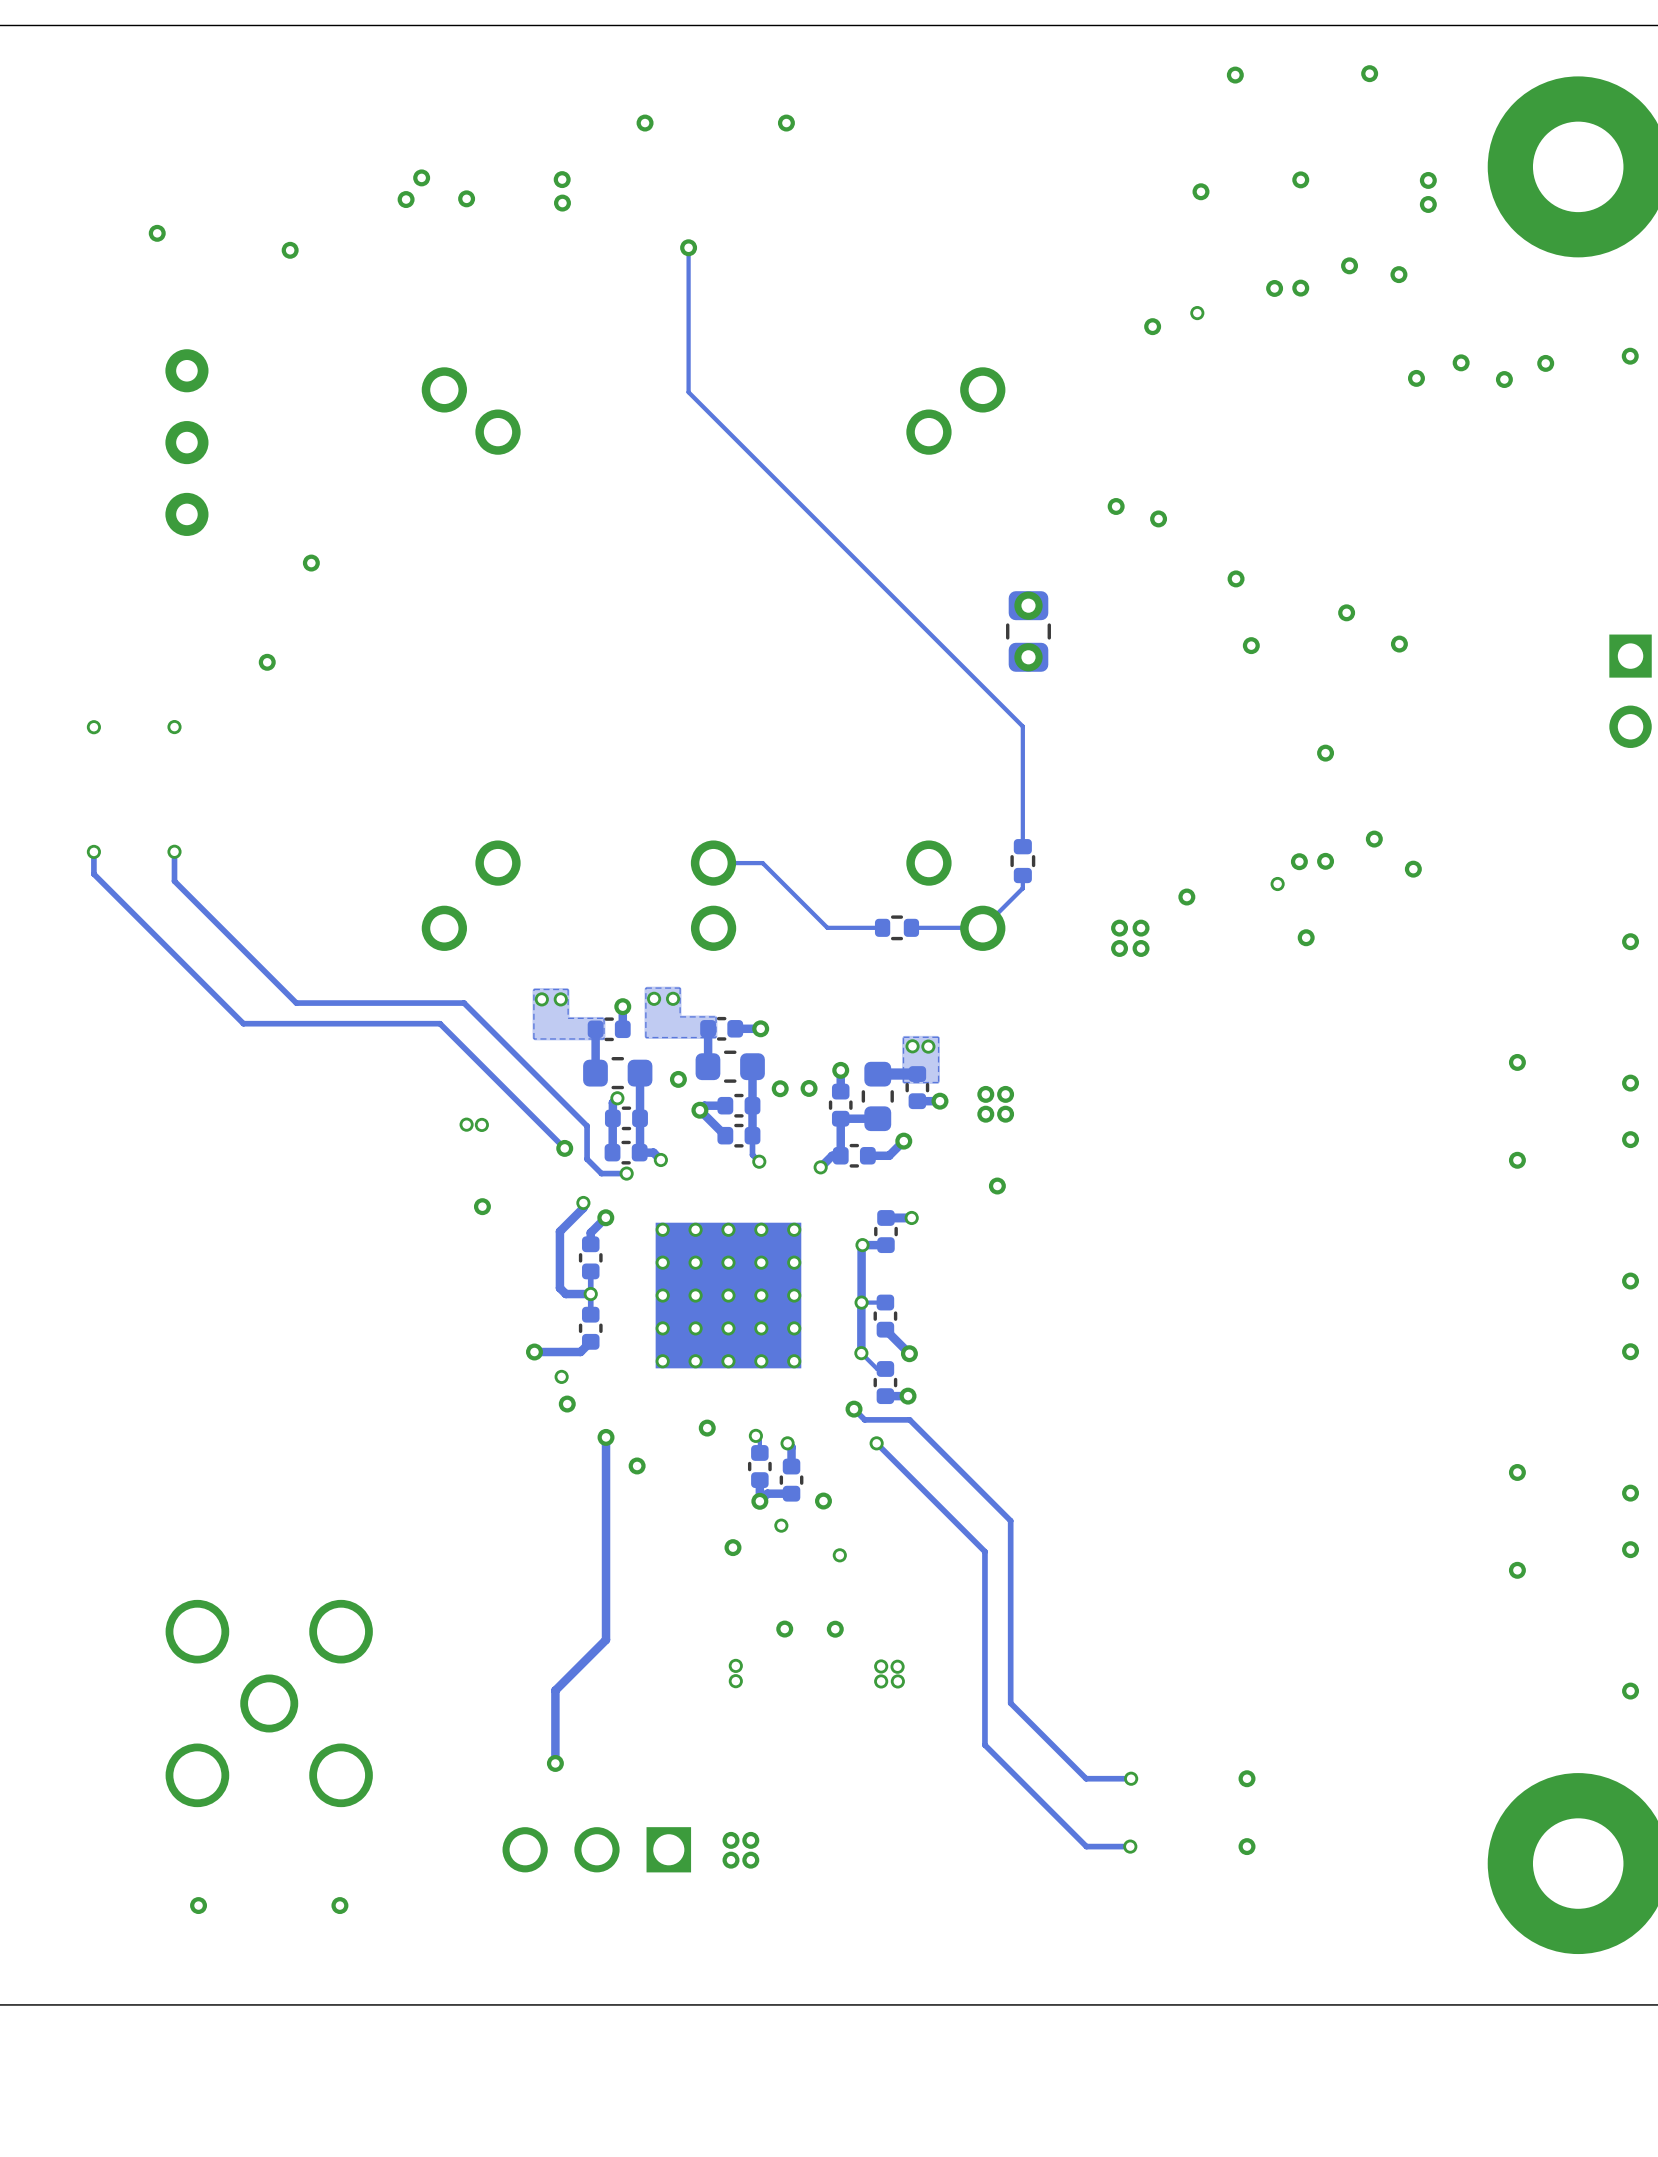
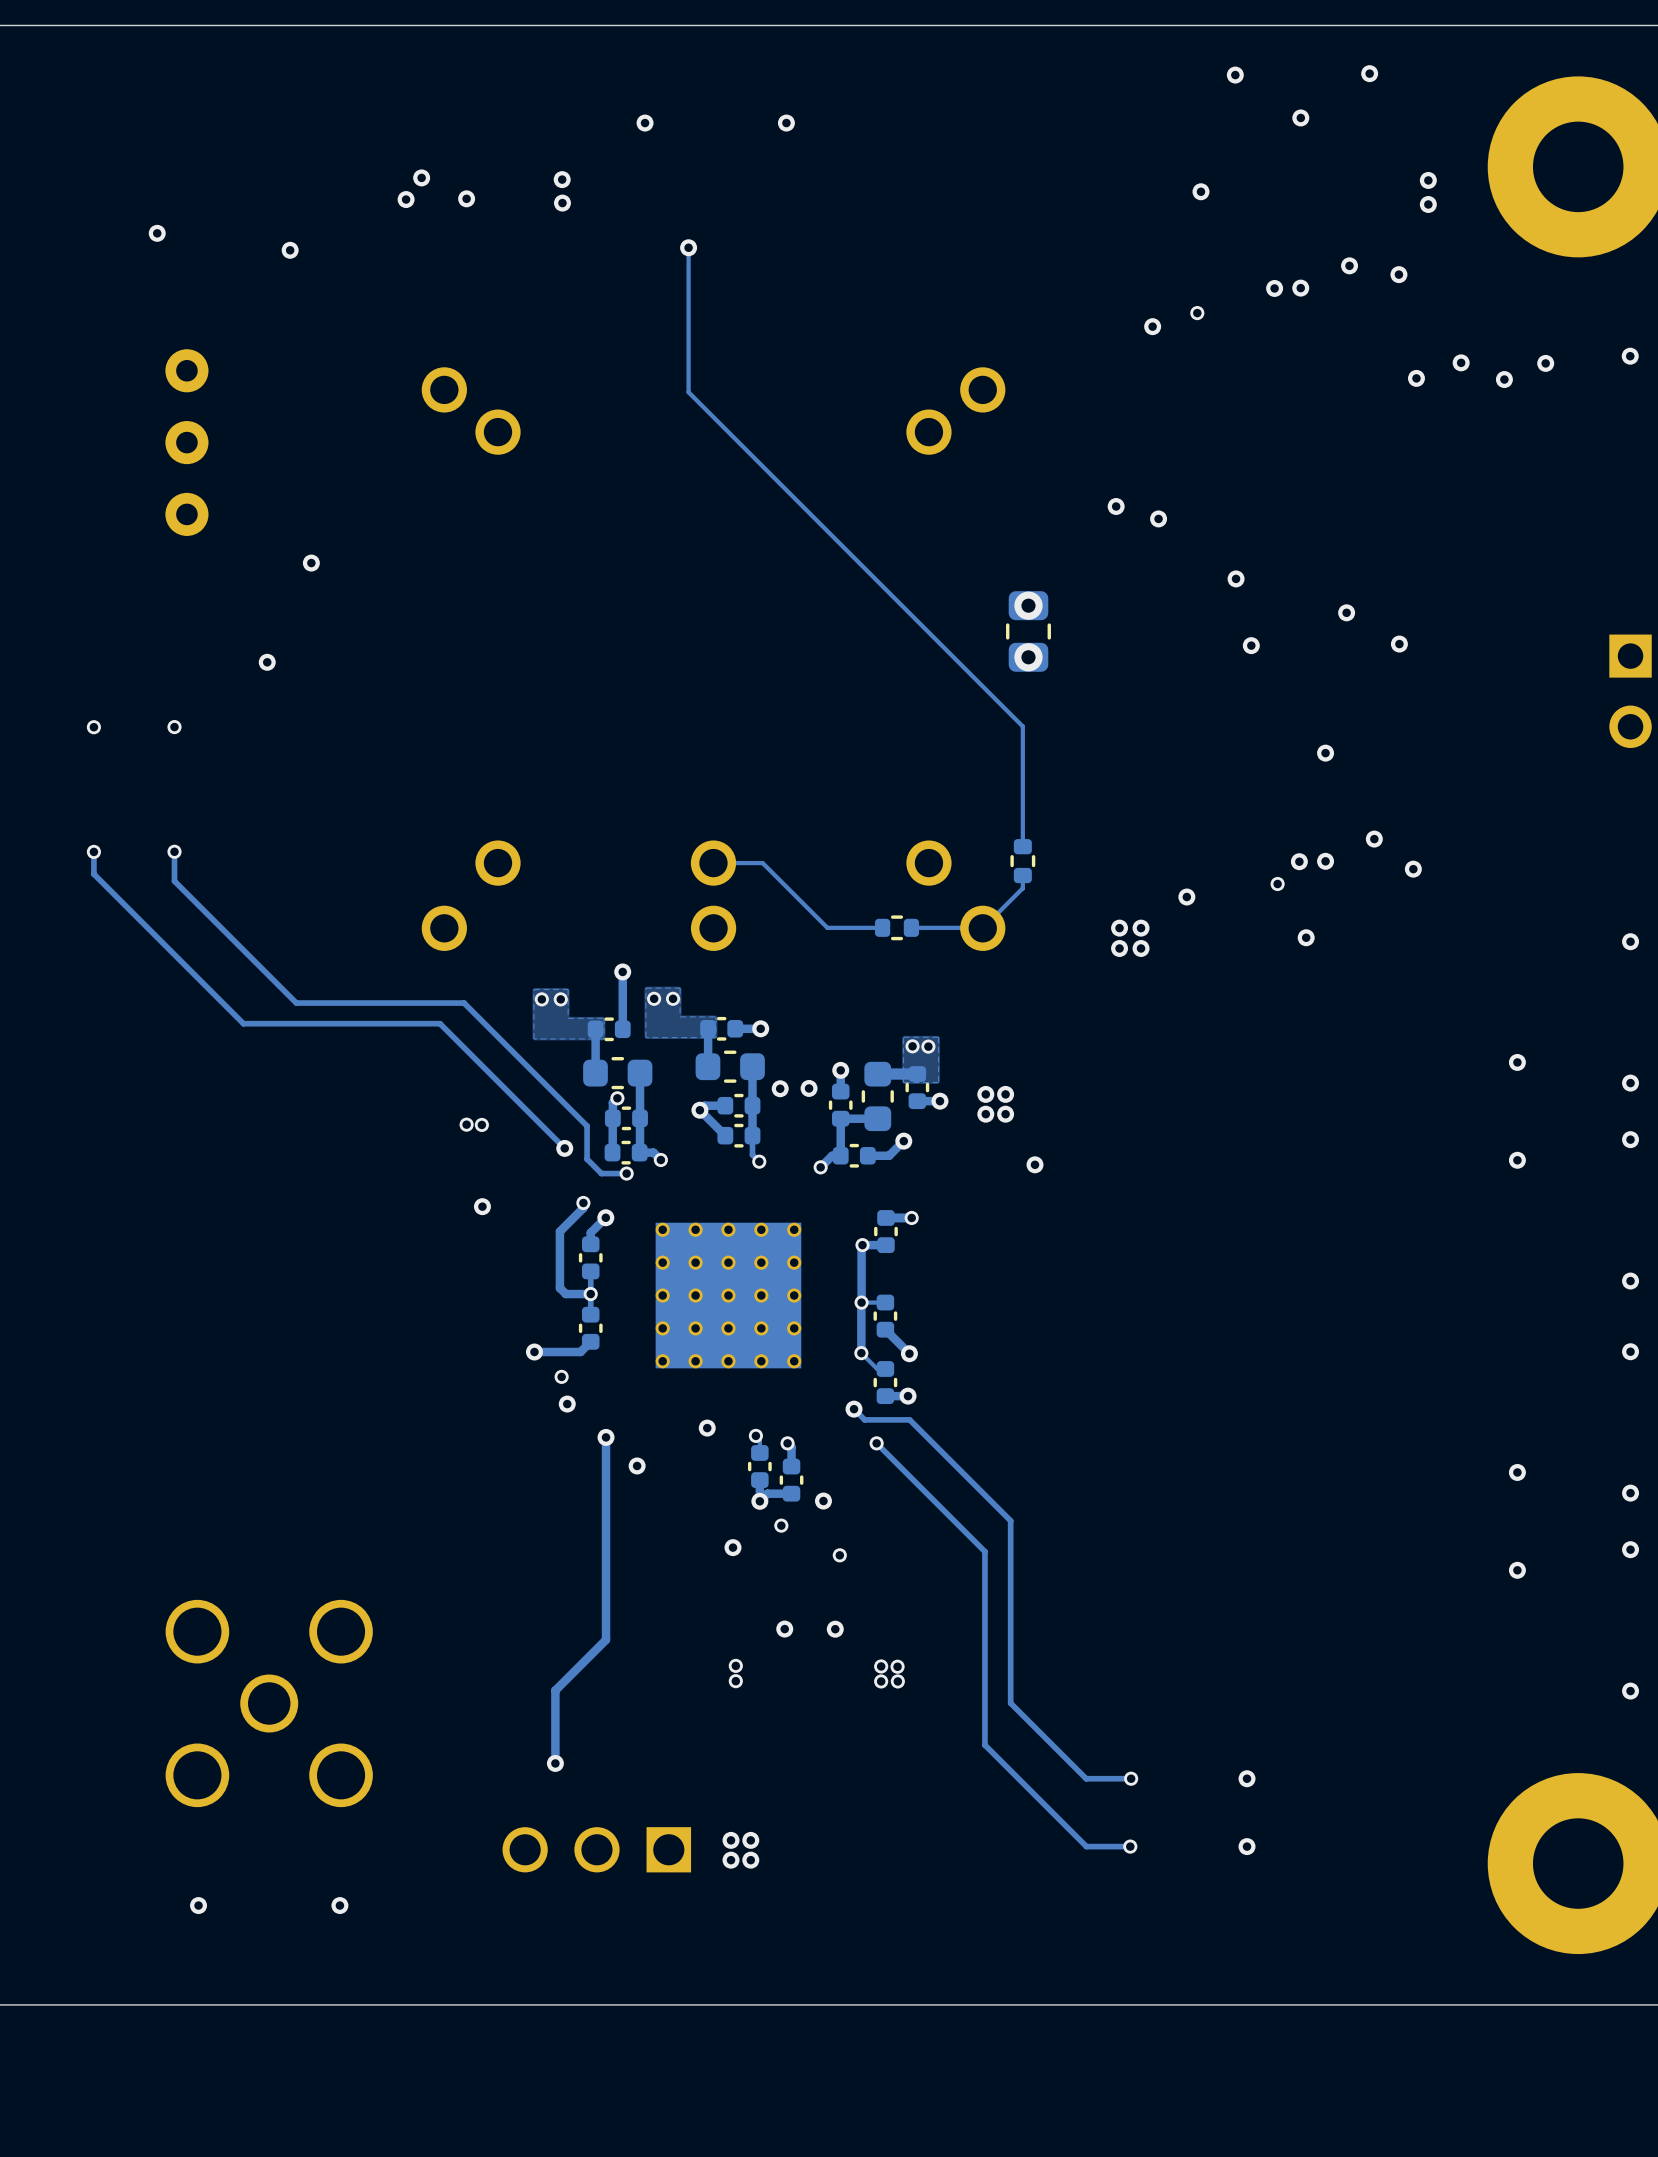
via position: (1300, 179) -> (1300, 117)
track: none -> (622, 972) (622, 1006)
via position: (622, 1006) -> (622, 971)
via: (678, 1079) -> none
via position: (997, 1186) -> (1035, 1164)

